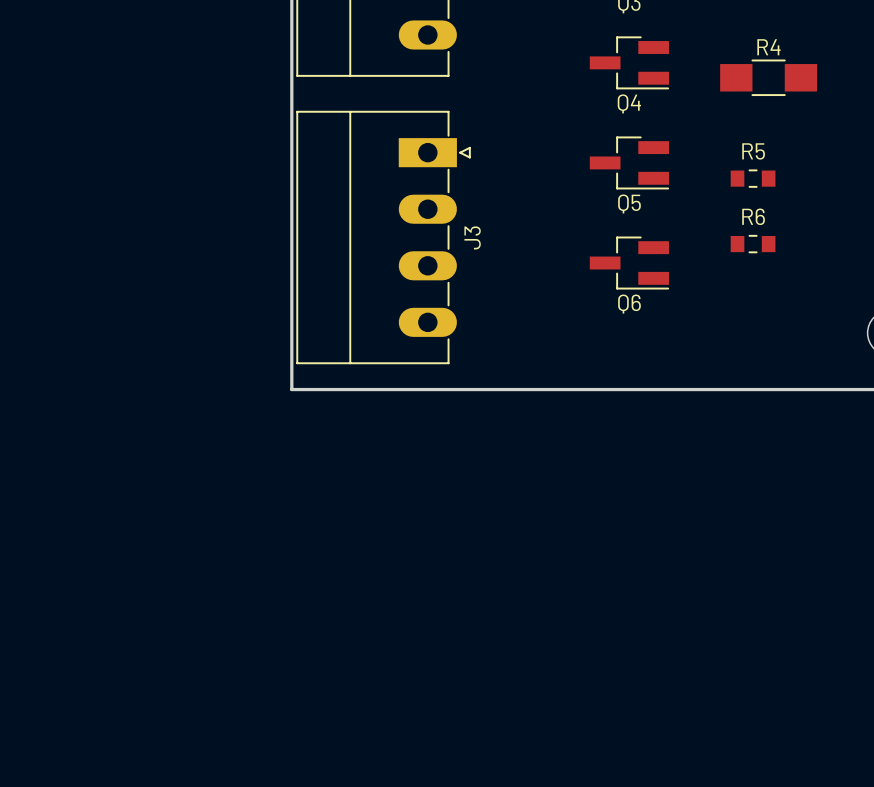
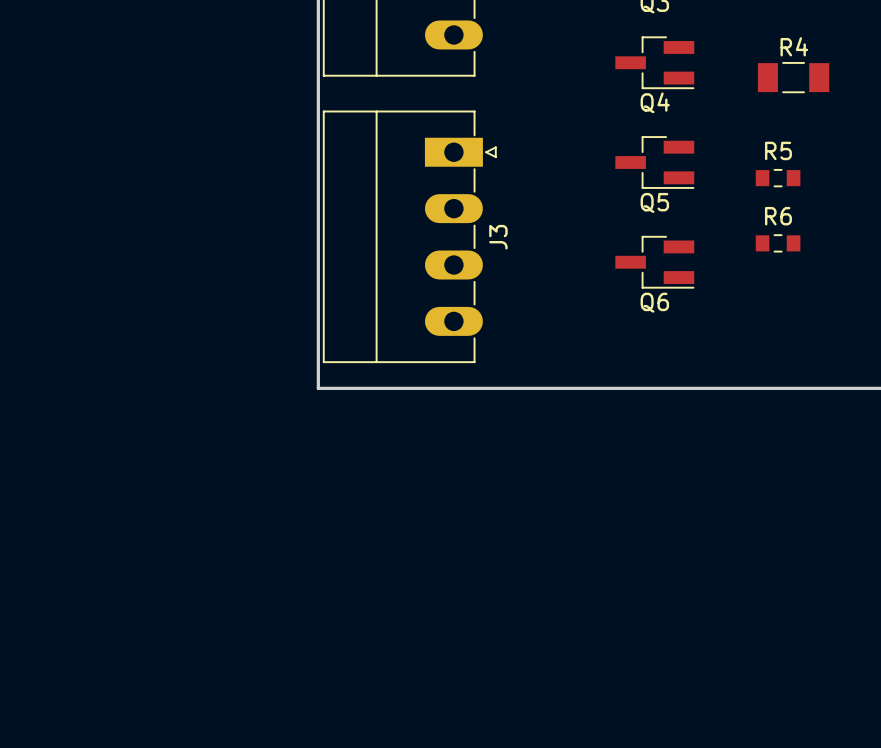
R4 footprint: [720, 59, 818, 97] -> [757, 61, 830, 94]

